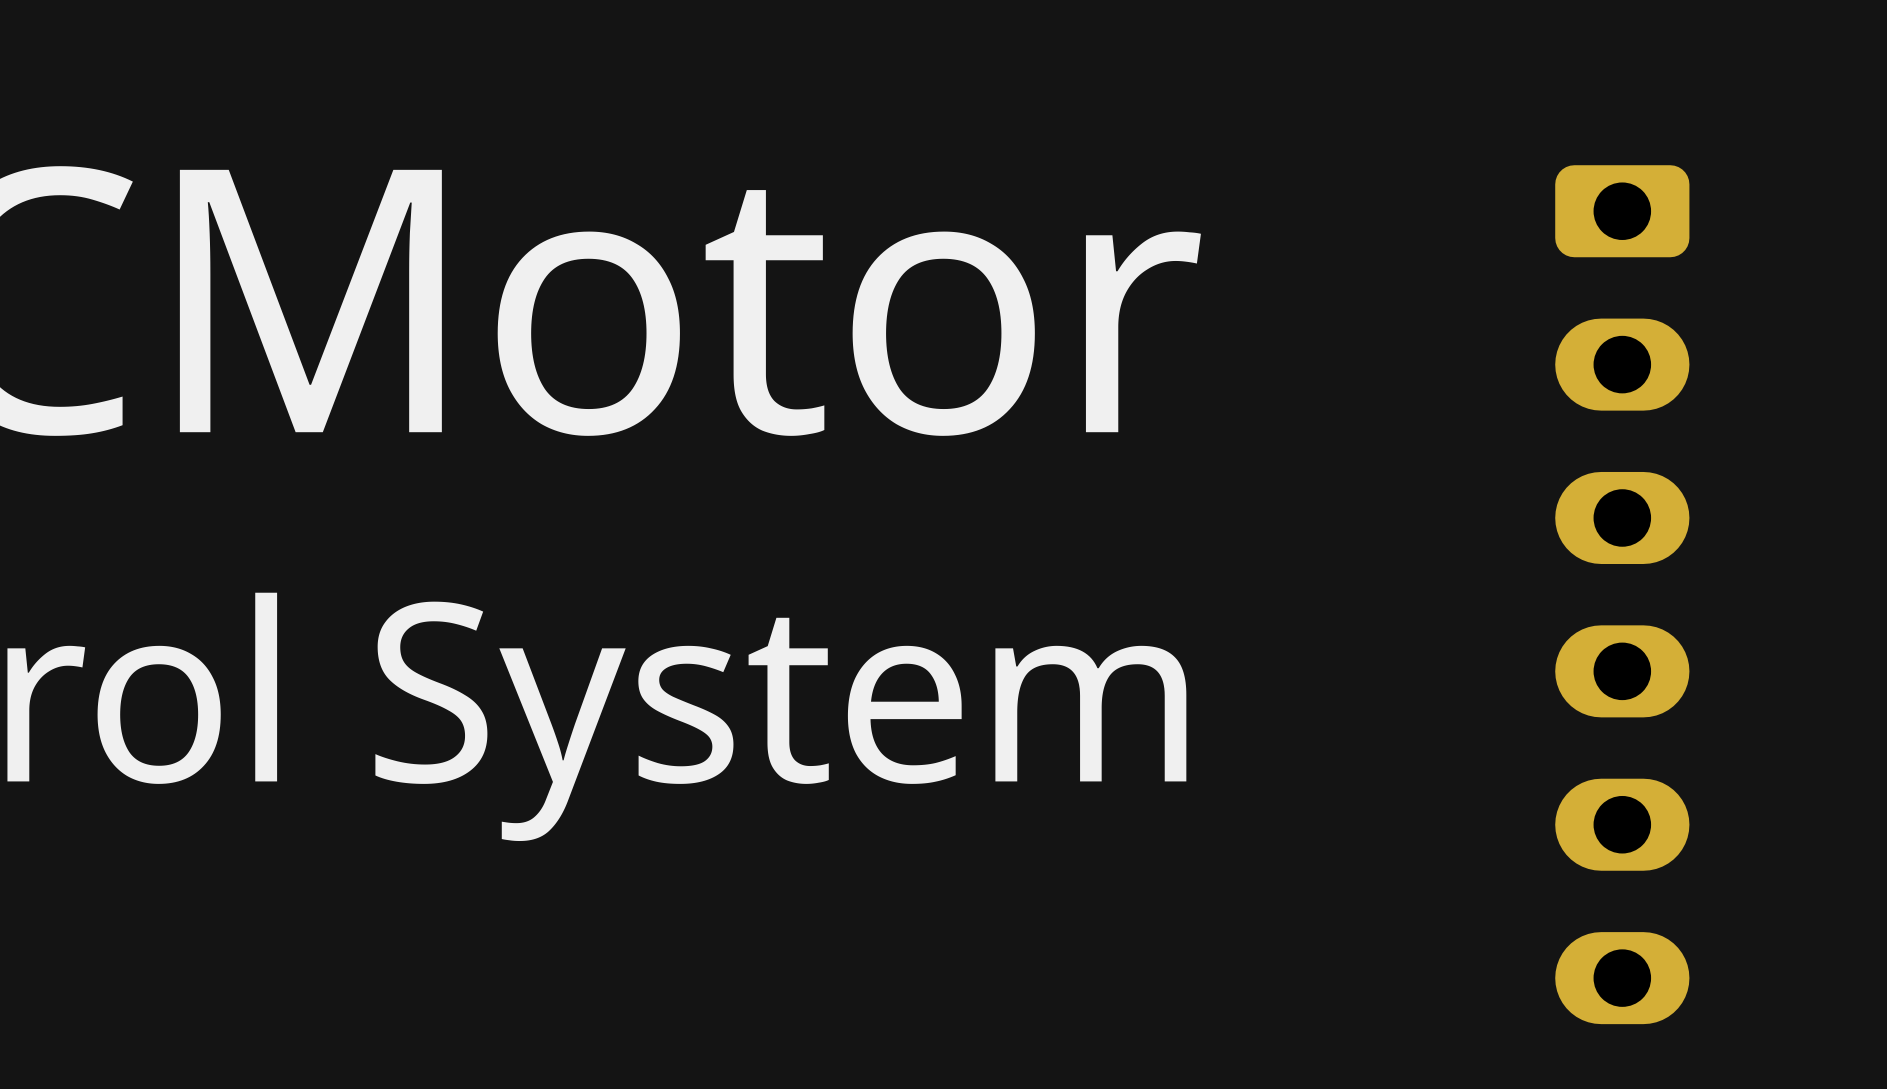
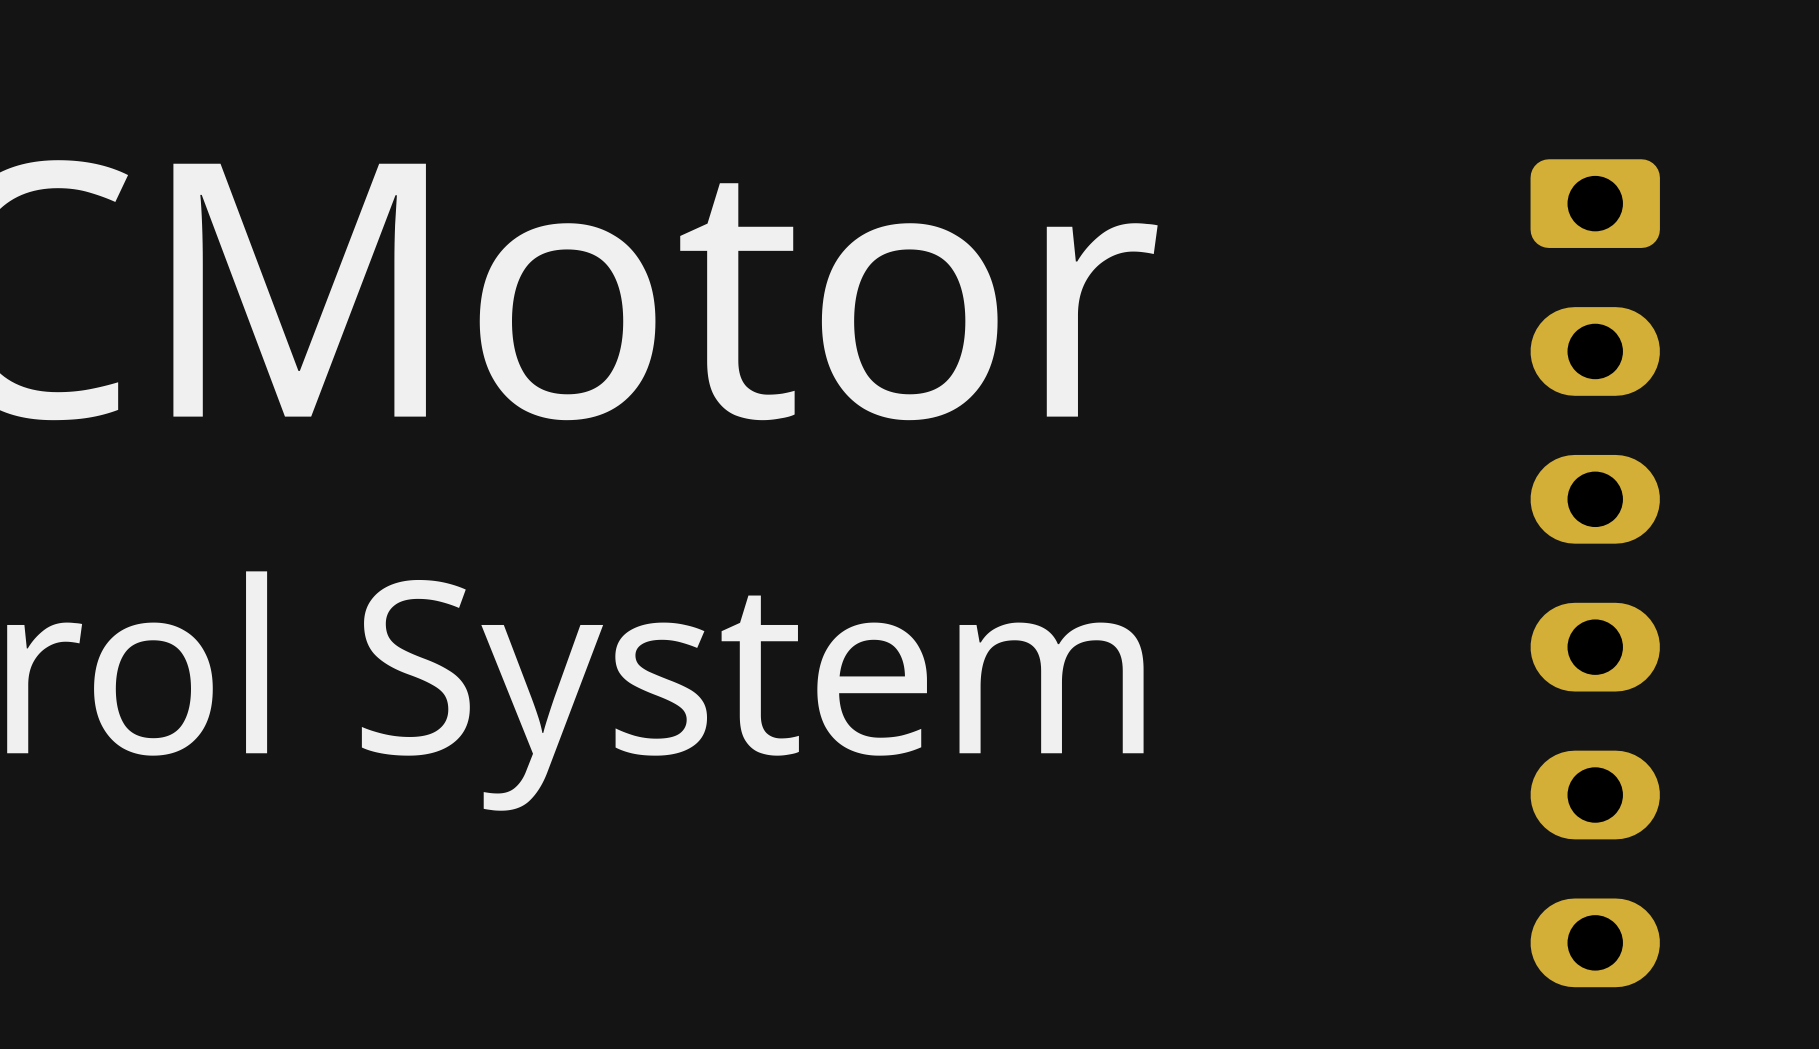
part position: (1622, 594) -> (1595, 573)

